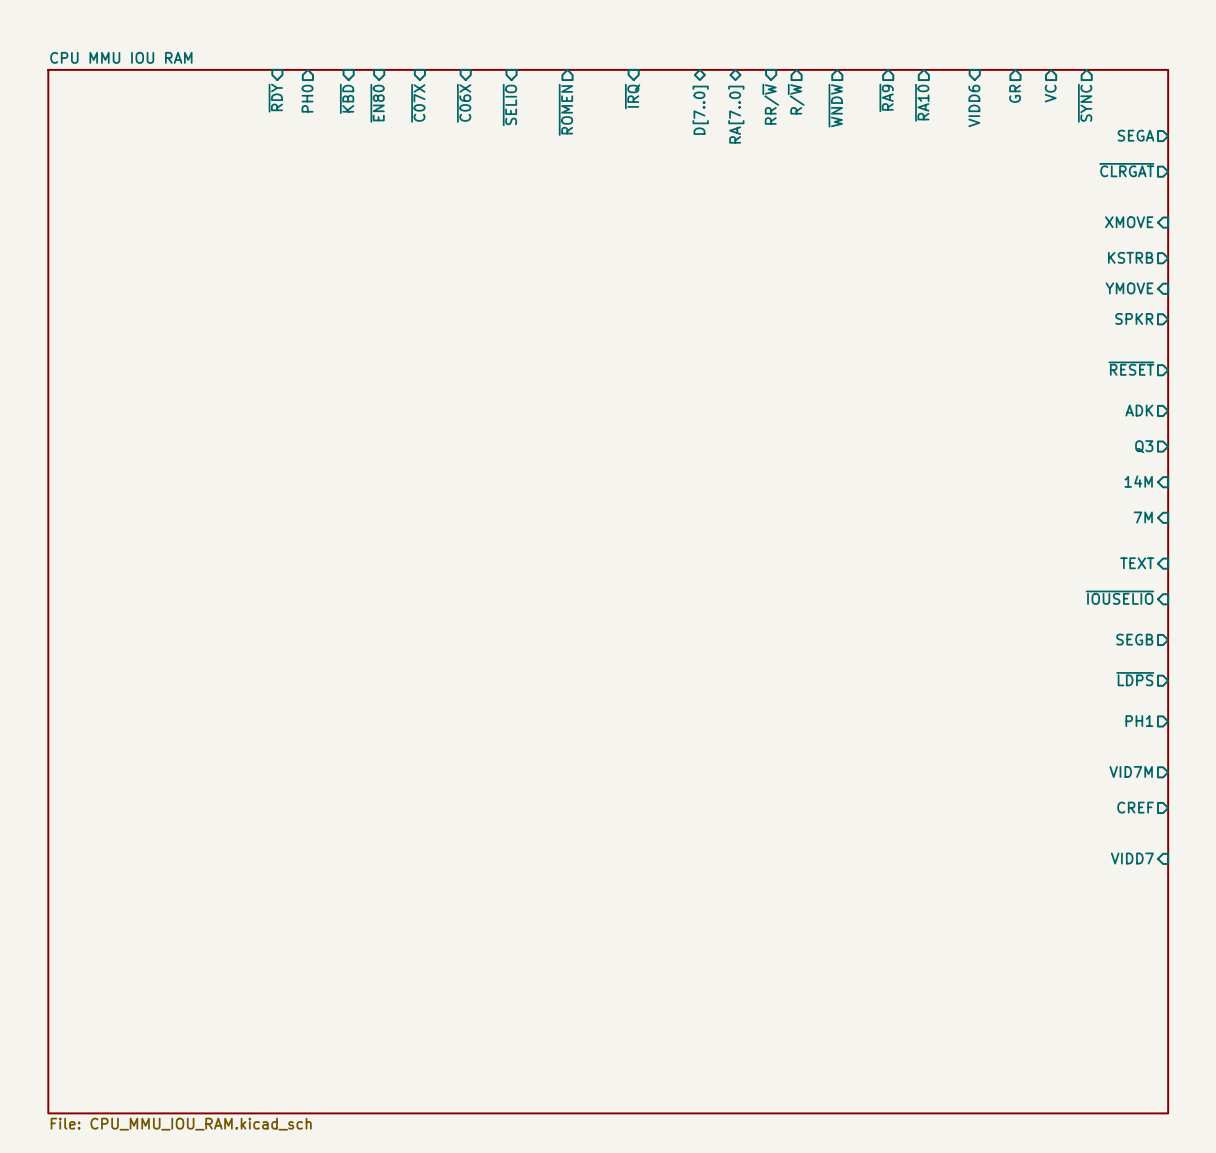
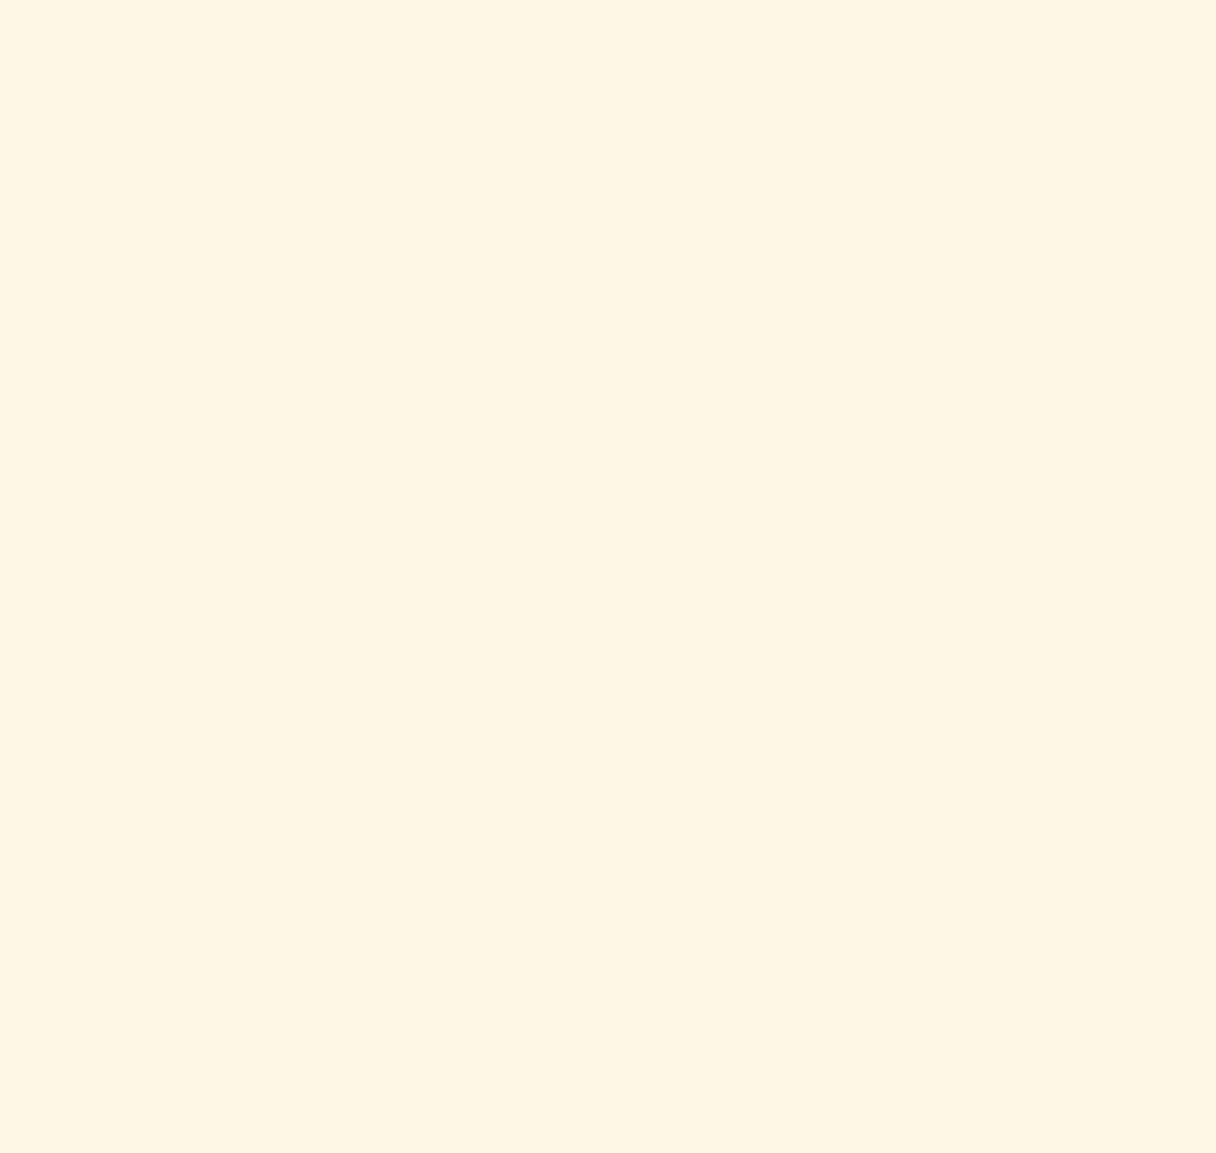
sheet pin: GR (1015, 93) -> none
sheet pin: VC (1050, 93) -> none
sheet pin: ~{IRQ} (632, 96) -> none
sheet pin: ~{RA9} (886, 97) -> none
sheet pin: ~{RDY} (275, 98) -> none
sheet pin: PH0 (307, 98) -> none
sheet pin: ~{KBD} (347, 98) -> none
sheet pin: R/~{W} (796, 99) -> none
sheet pin: ~{RA10} (922, 102) -> none
sheet pin: ~{EN80} (377, 103) -> none
sheet pin: ~{C07X} (418, 103) -> none
sheet pin: ~{C06X} (464, 103) -> none
sheet pin: ~{SYNC} (1085, 103) -> none
sheet pin: ~{SELIO} (509, 104) -> none
sheet pin: RR/~{W} (770, 104) -> none
sheet pin: ~{WNDW} (835, 105) -> none
sheet pin: VIDD6 (974, 105) -> none
sheet pin: ~{ROMEN} (565, 109) -> none
sheet pin: D[7..0] (700, 110) -> none
sheet pin: RA[7..0] (736, 114) -> none
sheet pin: SEGA (1136, 135) -> none
sheet pin: ~{CLRGAT} (1126, 170) -> none
sheet pin: XMOVE (1129, 222) -> none
sheet pin: KSTRB (1130, 257) -> none
sheet pin: YMOVE (1129, 288) -> none
sheet pin: SPKR (1134, 318) -> none
sheet pin: ~{RESET} (1131, 368) -> none
sheet pin: ADK (1139, 410) -> none
sheet pin: Q3 (1144, 446) -> none
sheet pin: 14M (1138, 481) -> none
sheet pin: 7M (1143, 517) -> none
sheet pin: TEXT (1137, 563) -> none
sheet CPU MMU IOU RAM: File: CPU_MMU_IOU_RAM.kicad_sch (608, 591) -> none
sheet pin: ~{IOUSELIO} (1120, 597) -> none
sheet pin: SEGB (1134, 639) -> none
sheet pin: ~{LDPS} (1135, 679) -> none
sheet pin: PH1 (1139, 721) -> none
sheet pin: VID7M (1131, 771) -> none
sheet pin: CREF (1135, 807) -> none
sheet pin: VIDD7 (1132, 858) -> none

